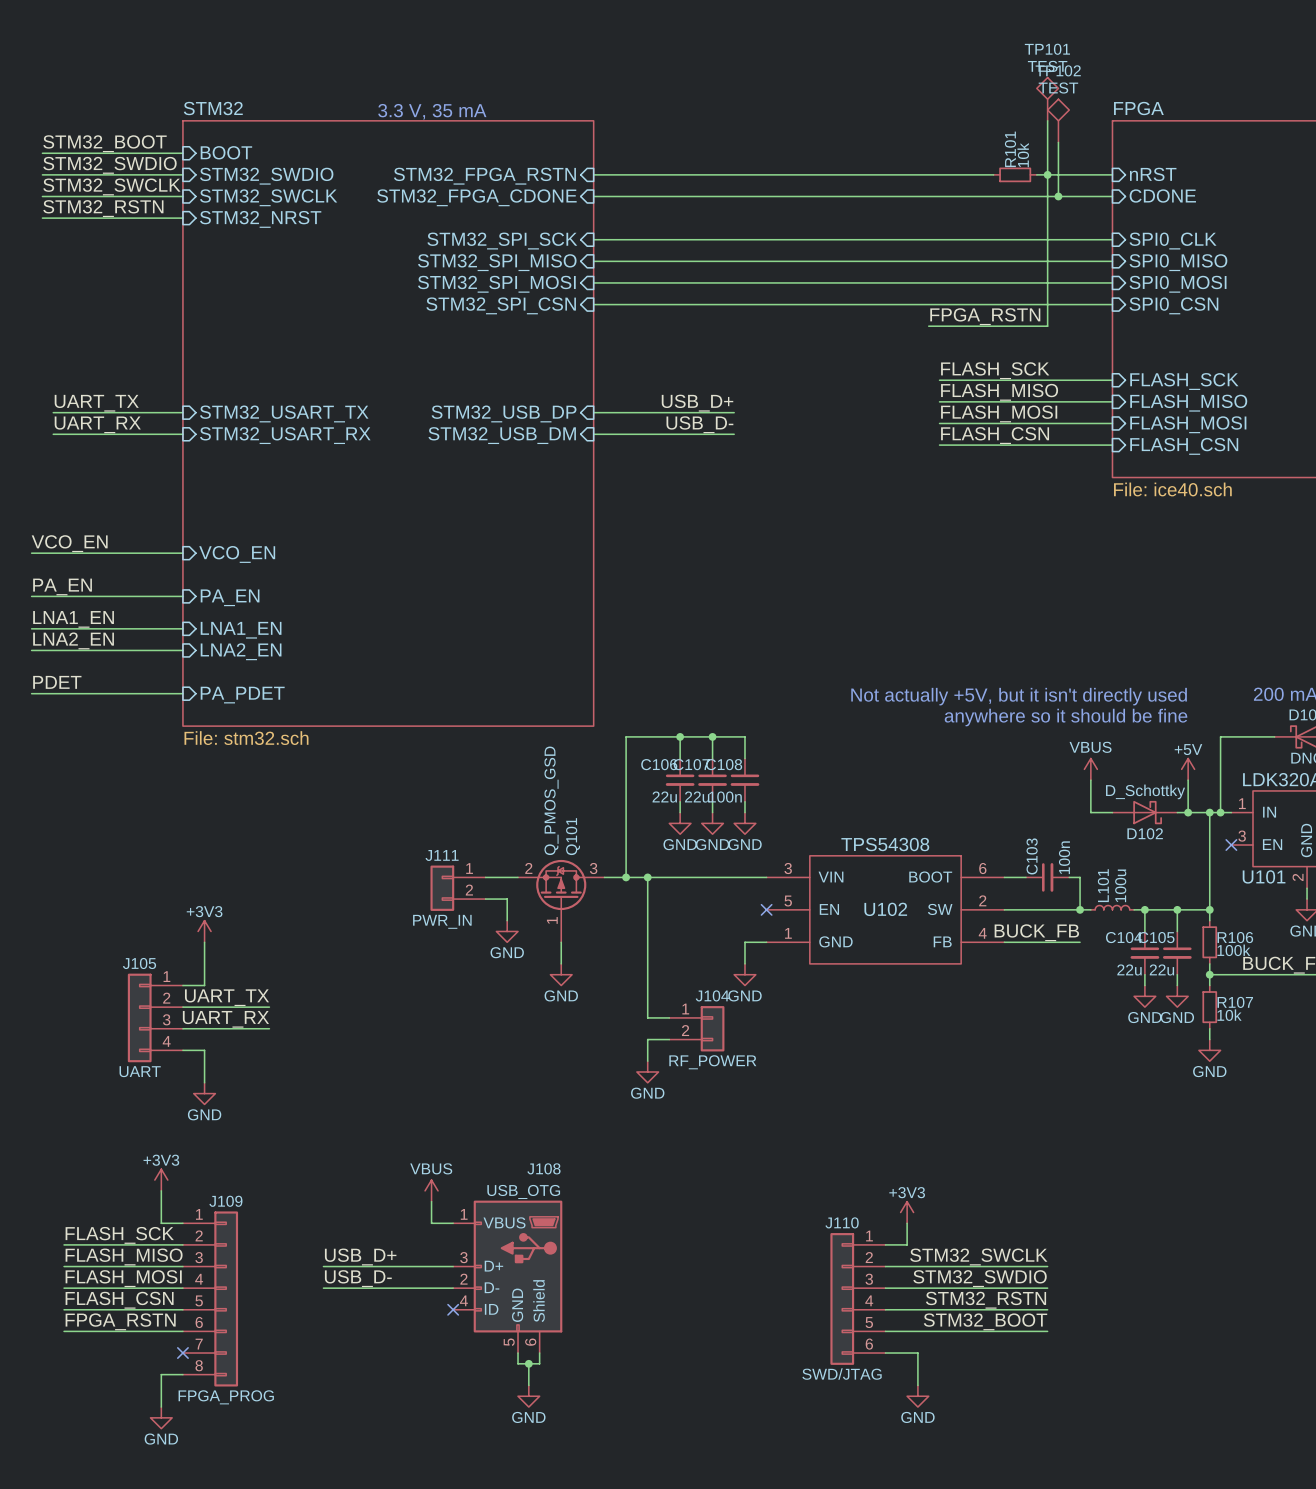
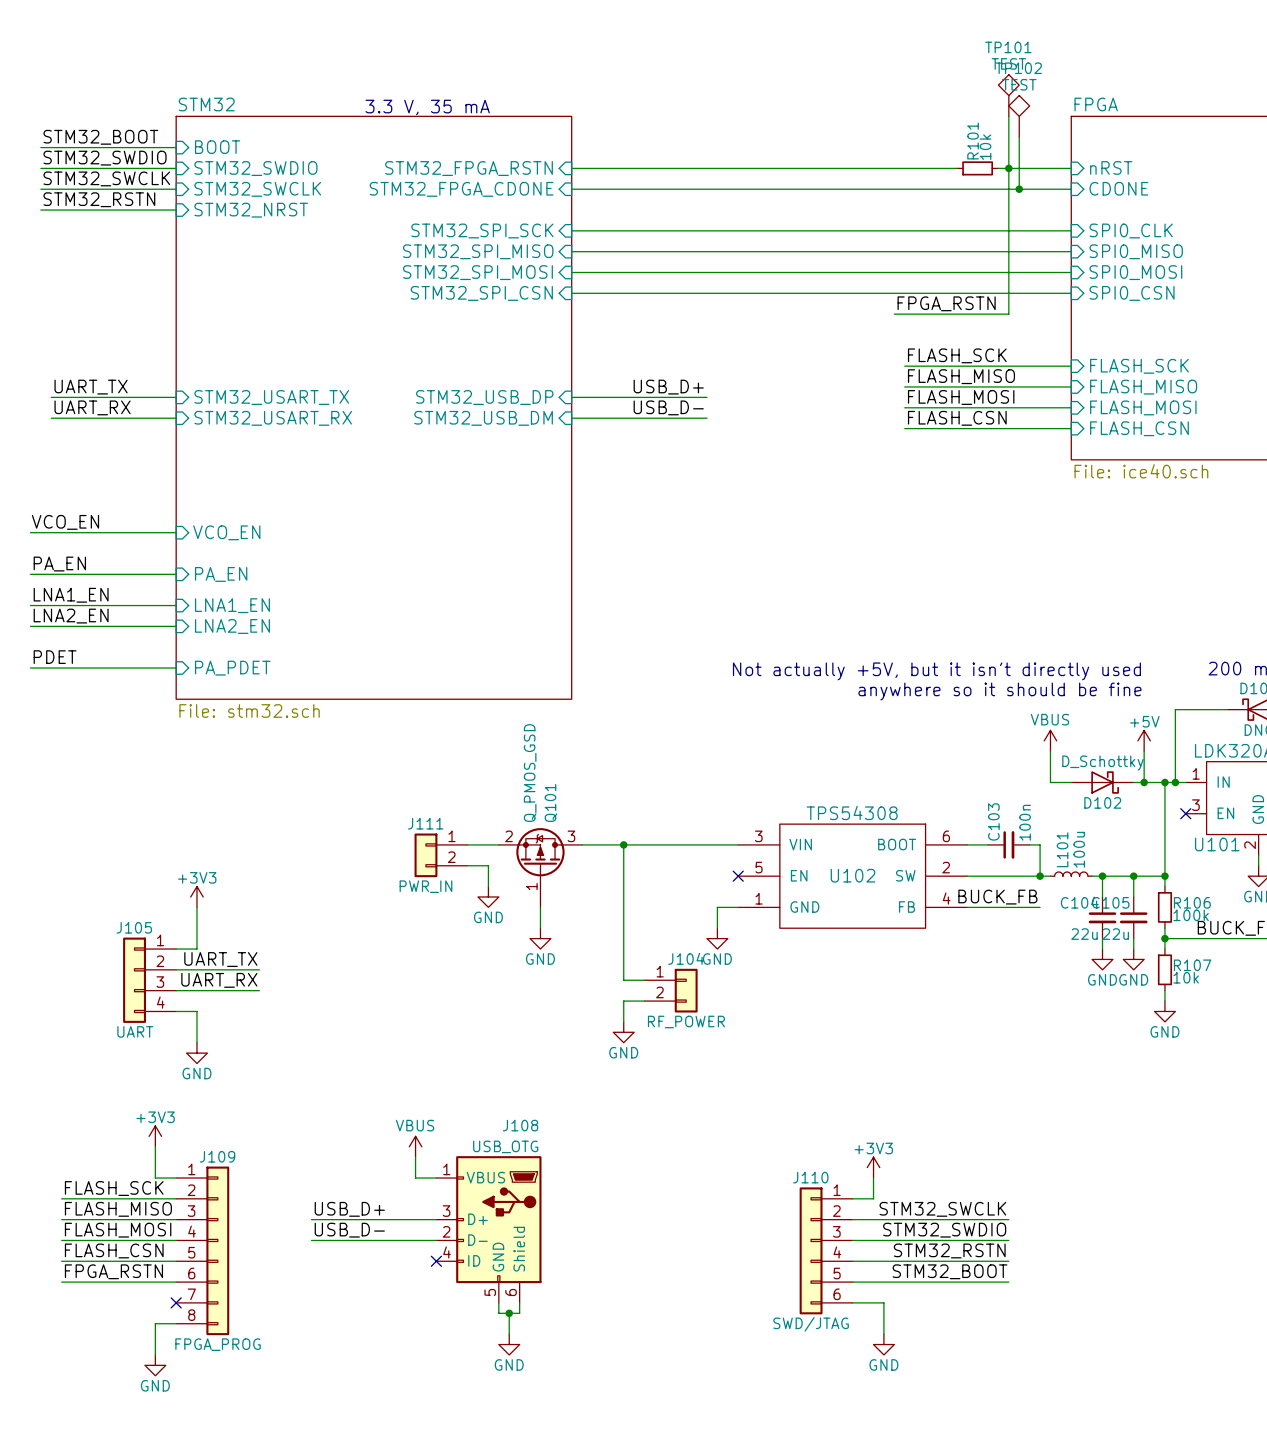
wire: (680, 736) (680, 758) -> none
junction: (680, 736) -> none
wire: (712, 736) (712, 758) -> none
junction: (712, 736) -> none
wire: (744, 758) (744, 736) (626, 736) (626, 877) -> none
C106: 22u (680, 780) -> none
C107: 22u (712, 780) -> none
C108: 100n (744, 780) -> none
wire: (680, 801) (680, 812) -> none
wire: (712, 801) (712, 812) -> none
wire: (744, 801) (744, 812) -> none
power symbol: GND (680, 823) -> none
power symbol: GND (712, 823) -> none
power symbol: GND (744, 823) -> none
junction: (626, 877) -> none

